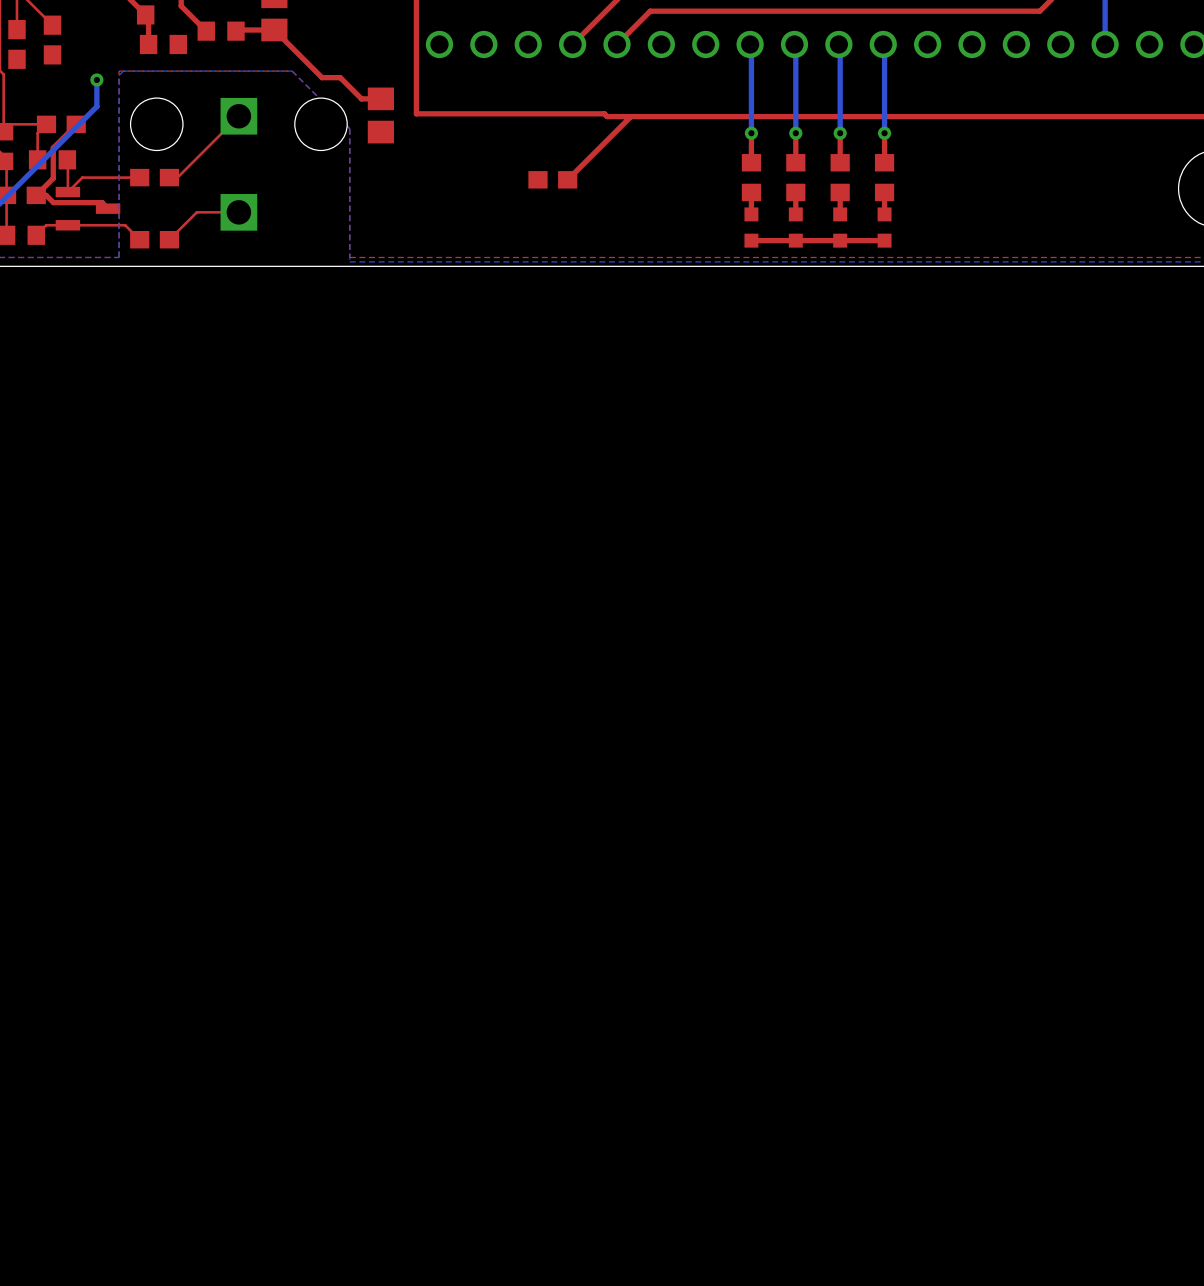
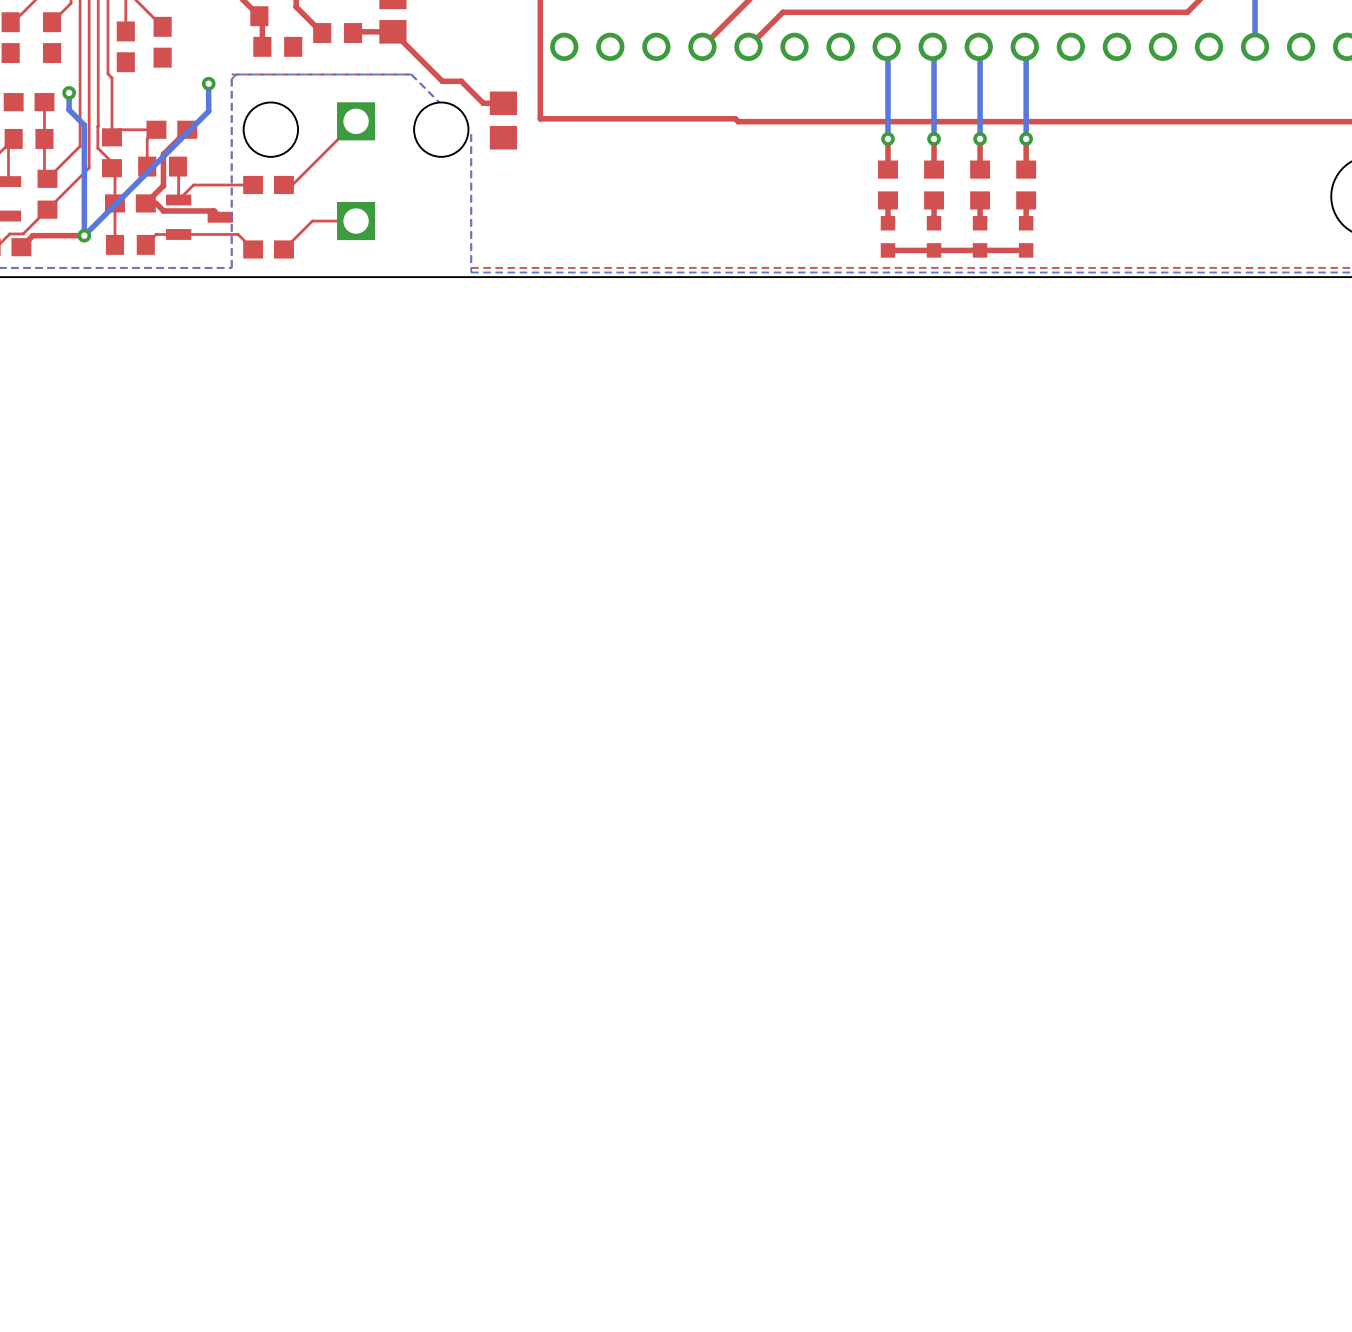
top track: (630, 116) (567, 179) -> none
part: (552, 179) -> none

